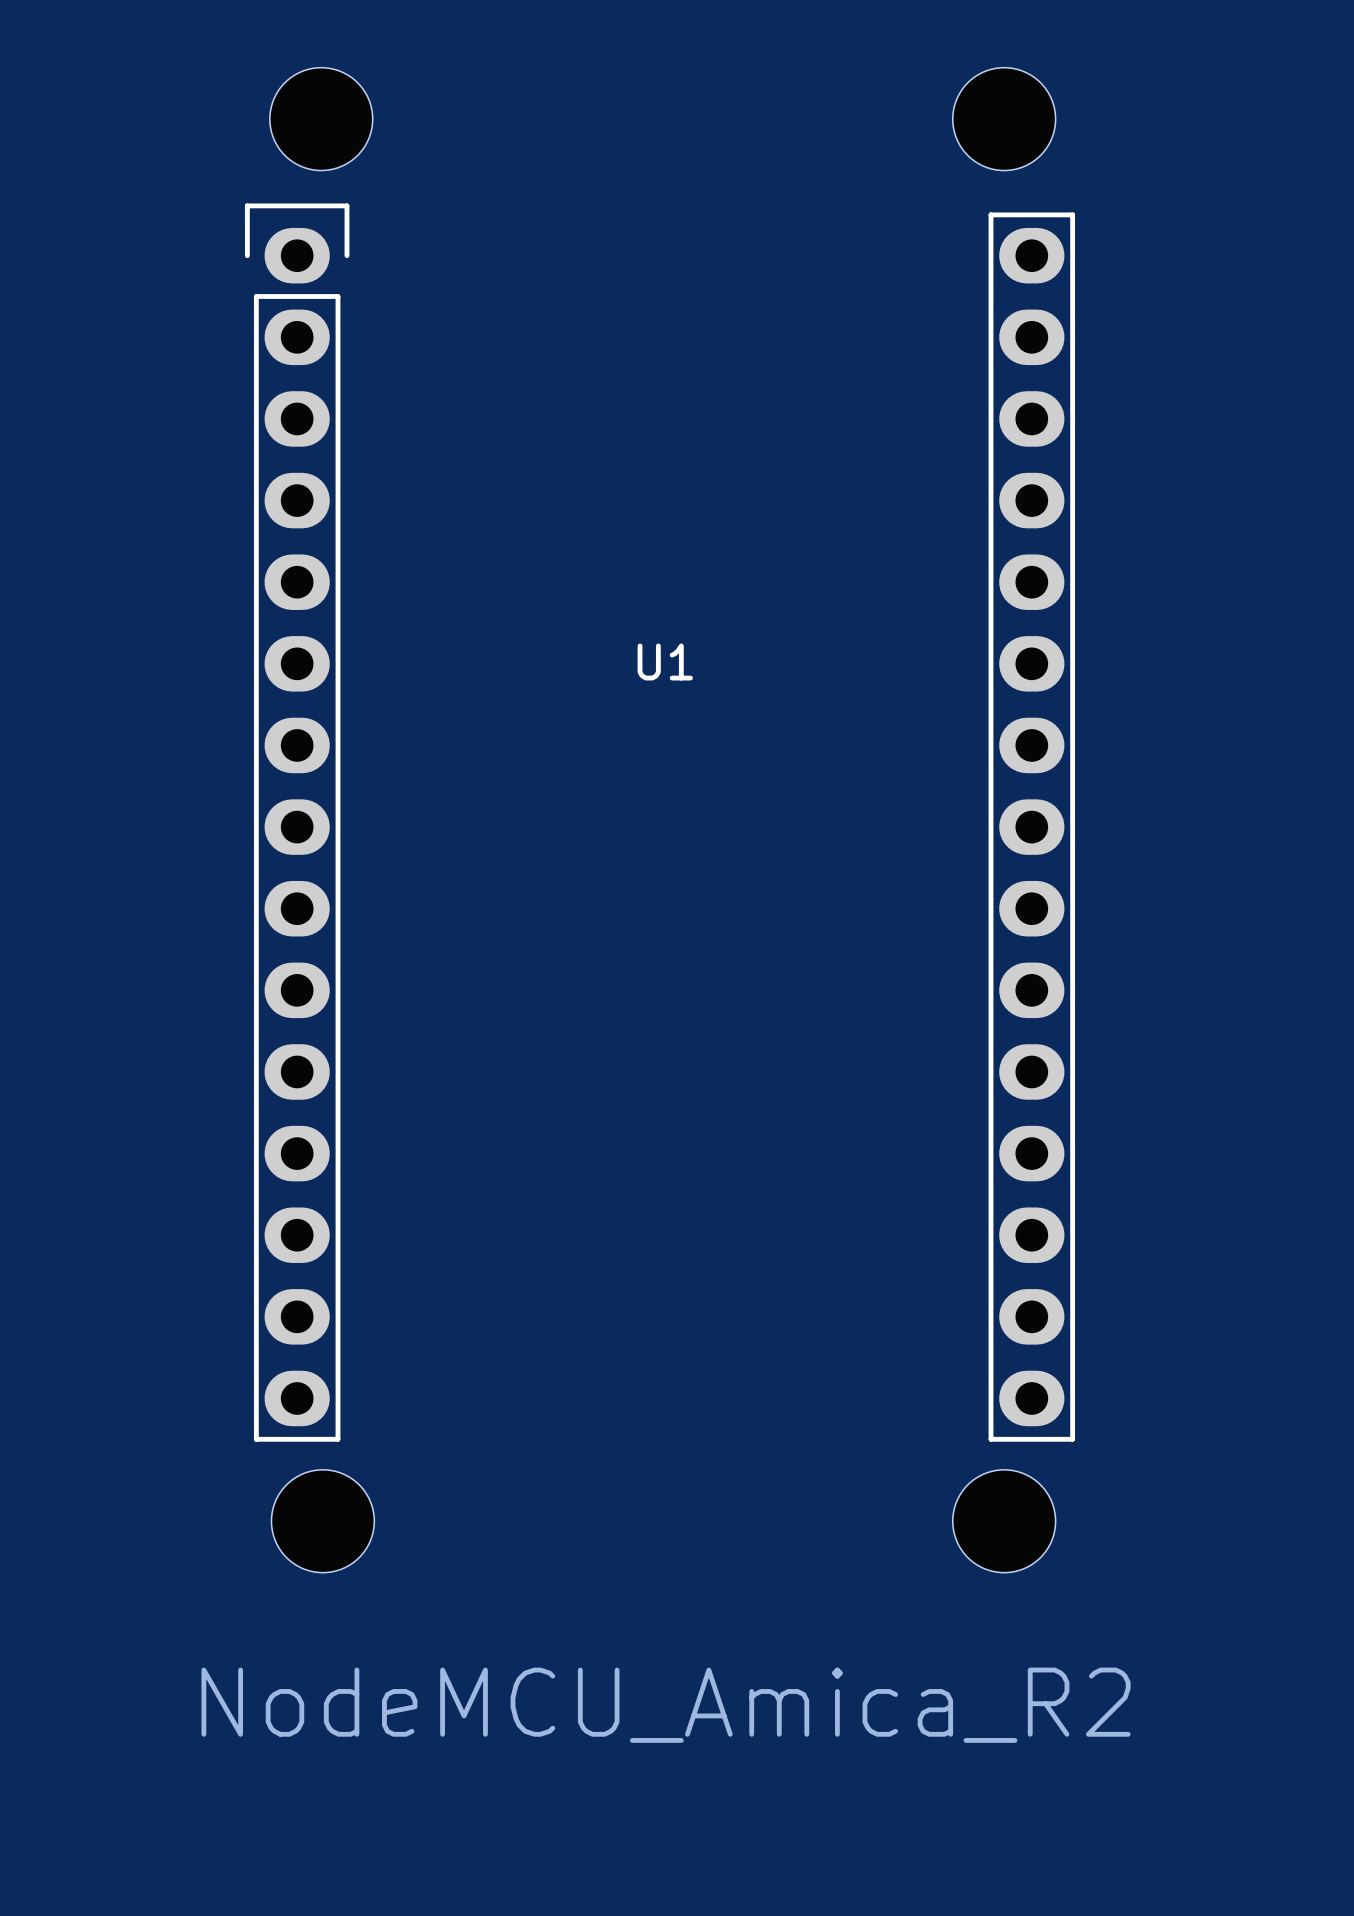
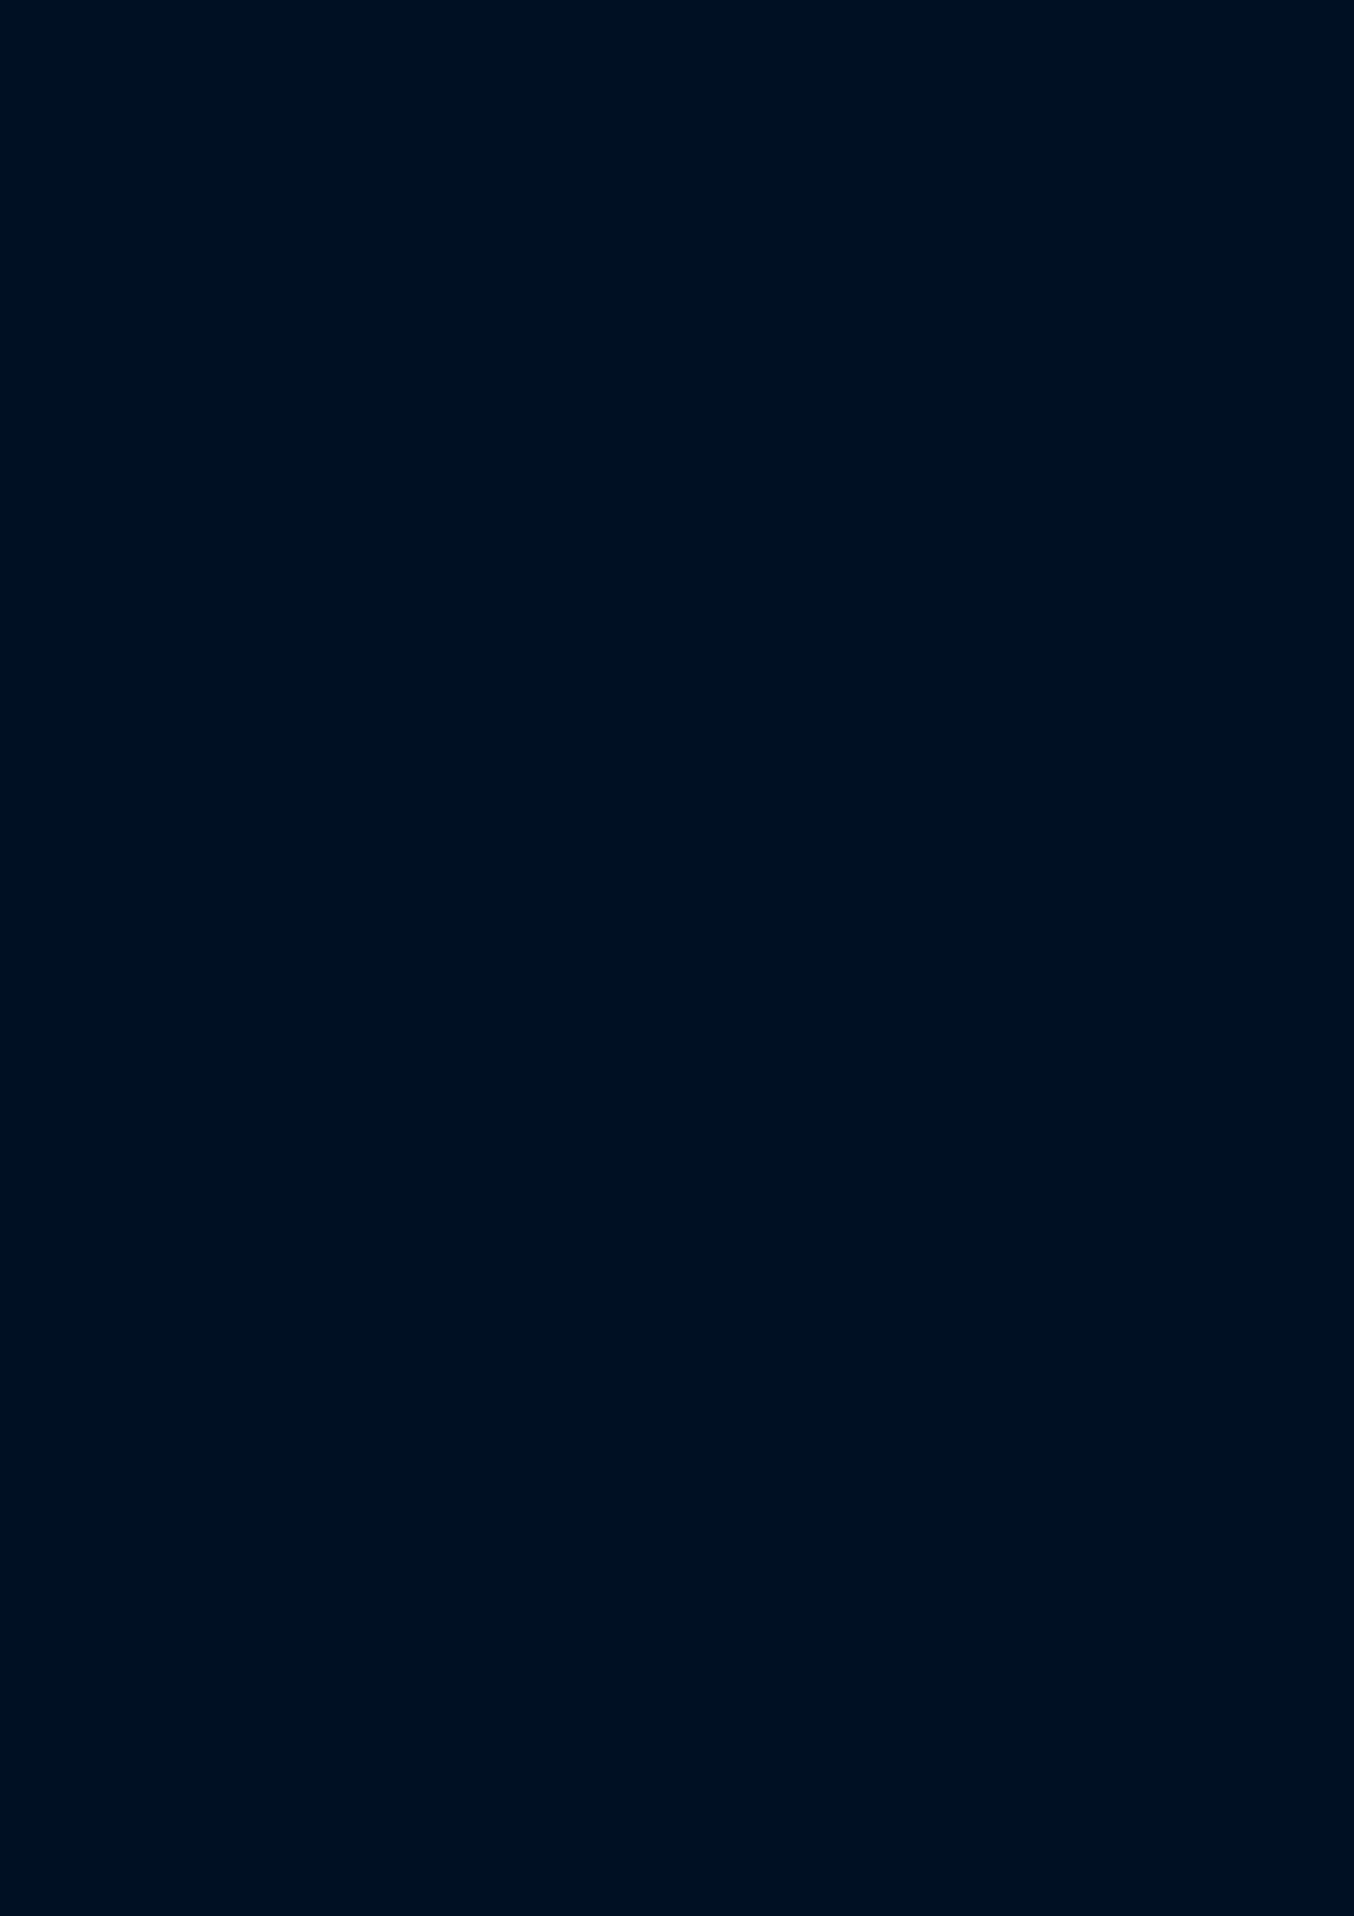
U1: NodeMCU_Amica_R2 (659, 820) -> none

